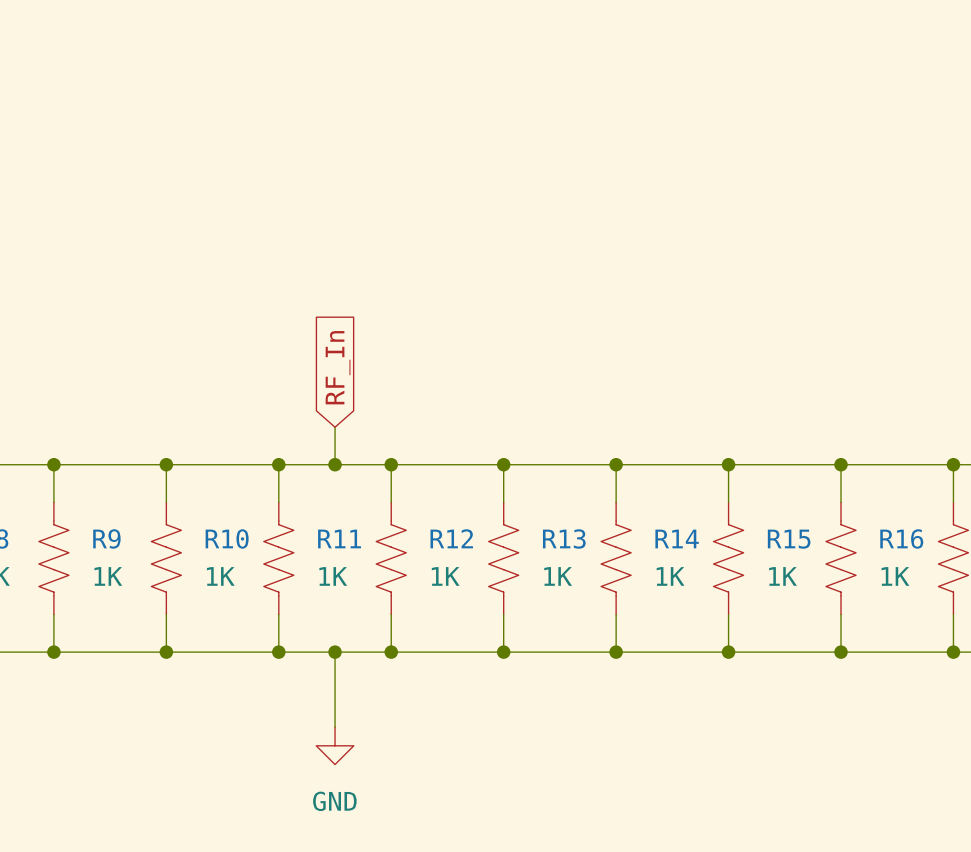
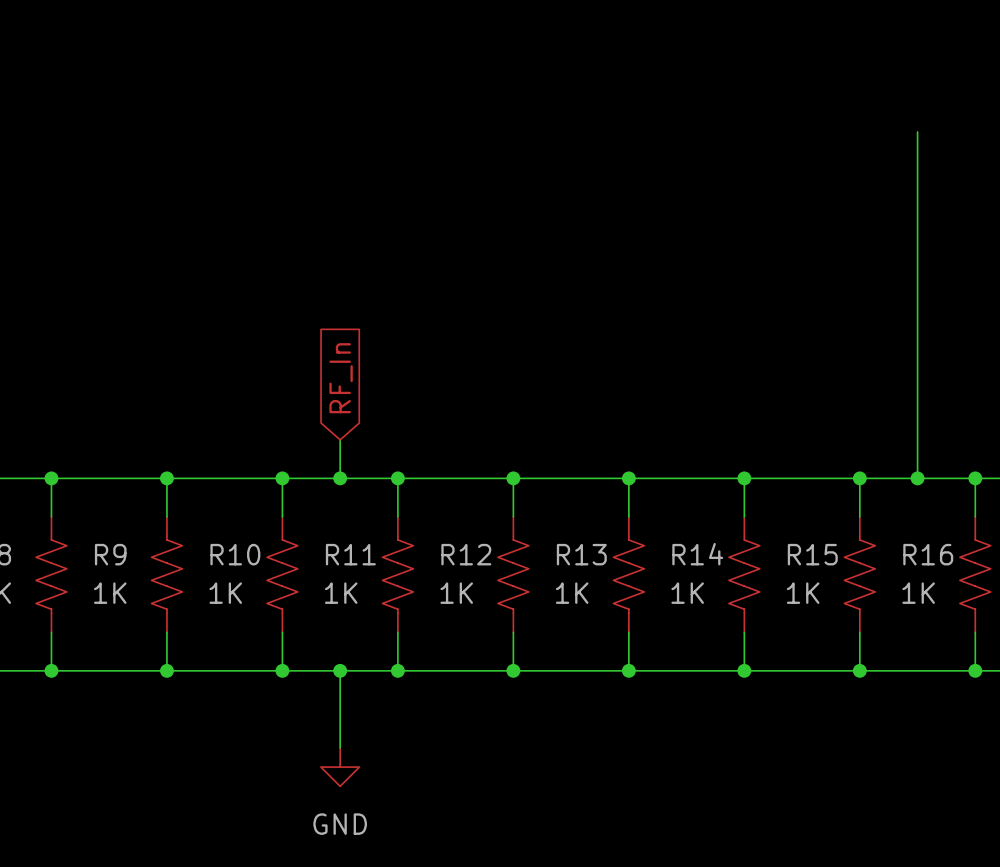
wire: none -> (917, 131) (917, 478)
junction: none -> (917, 478)

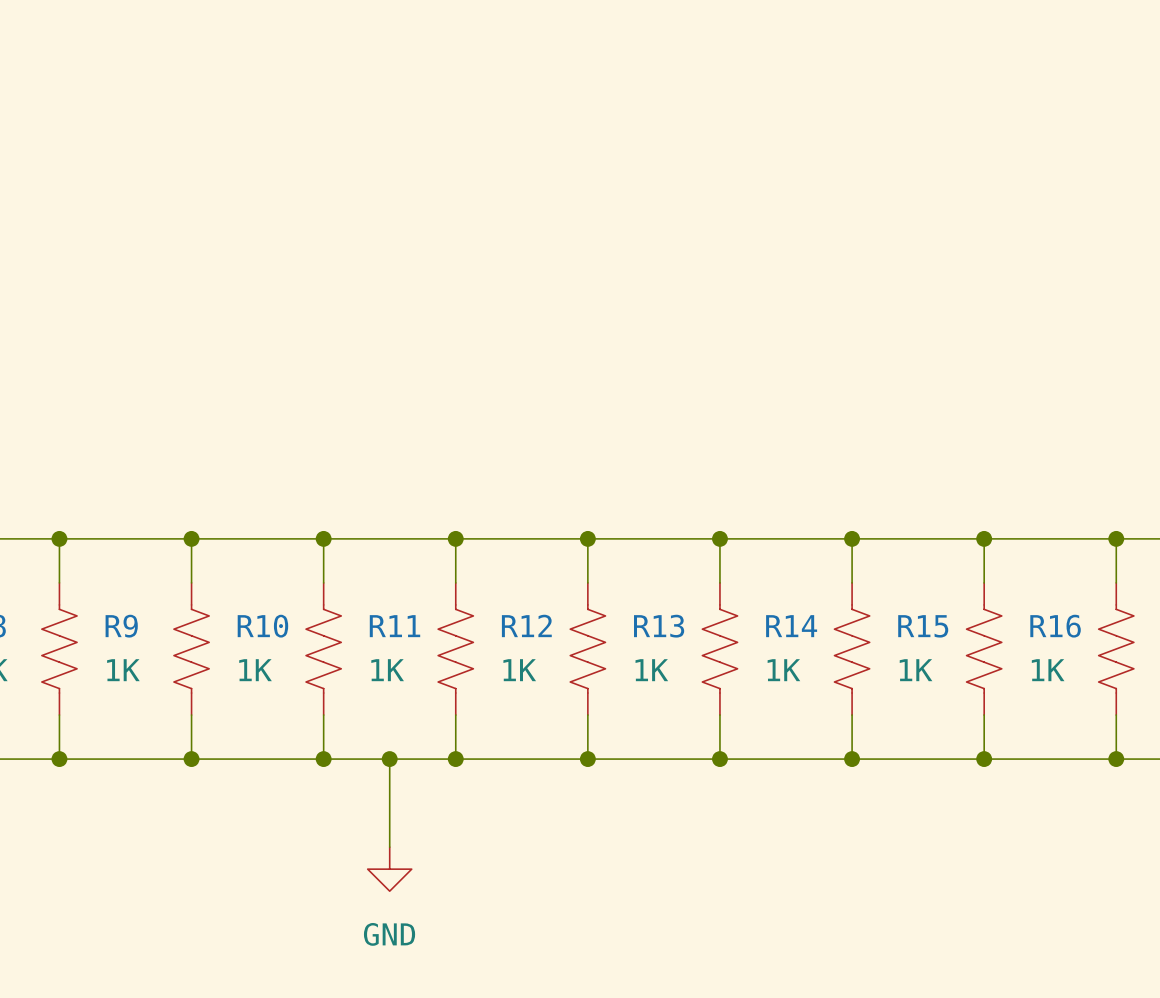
wire: (917, 131) (917, 478) -> none
global label: RF_In (341, 378) -> none
wire: (340, 439) (340, 478) -> none
junction: (340, 478) -> none
junction: (917, 478) -> none

